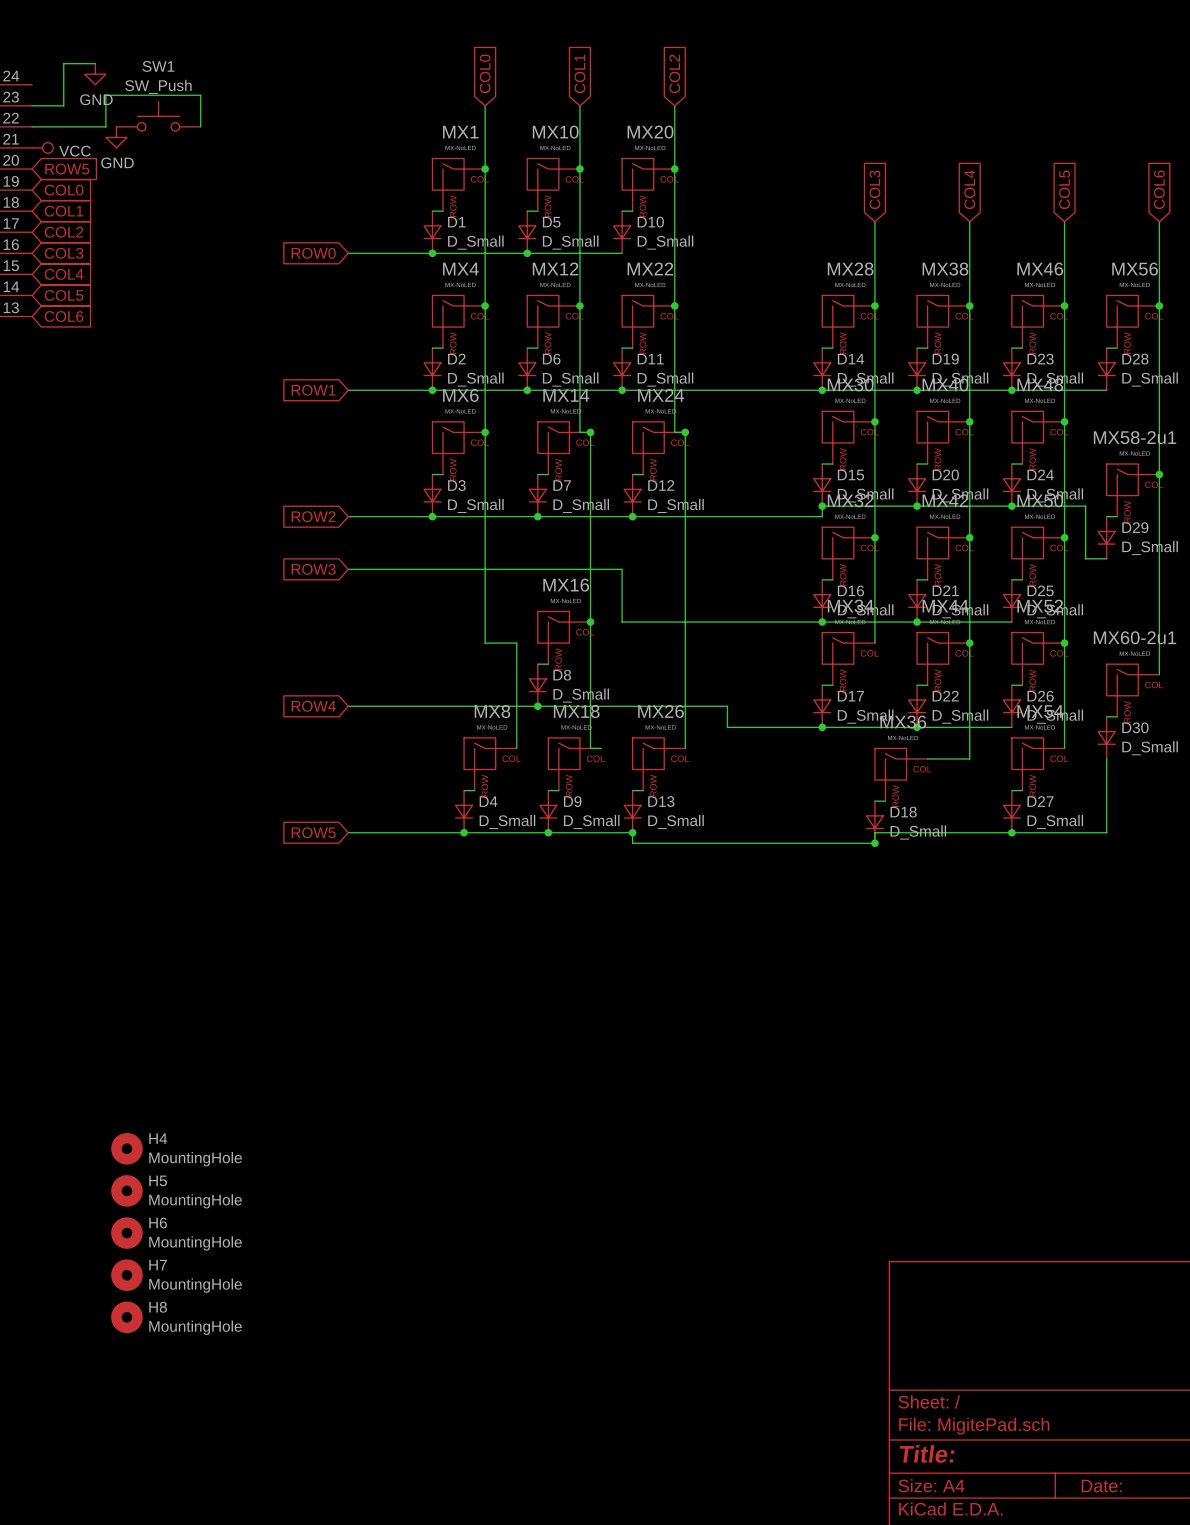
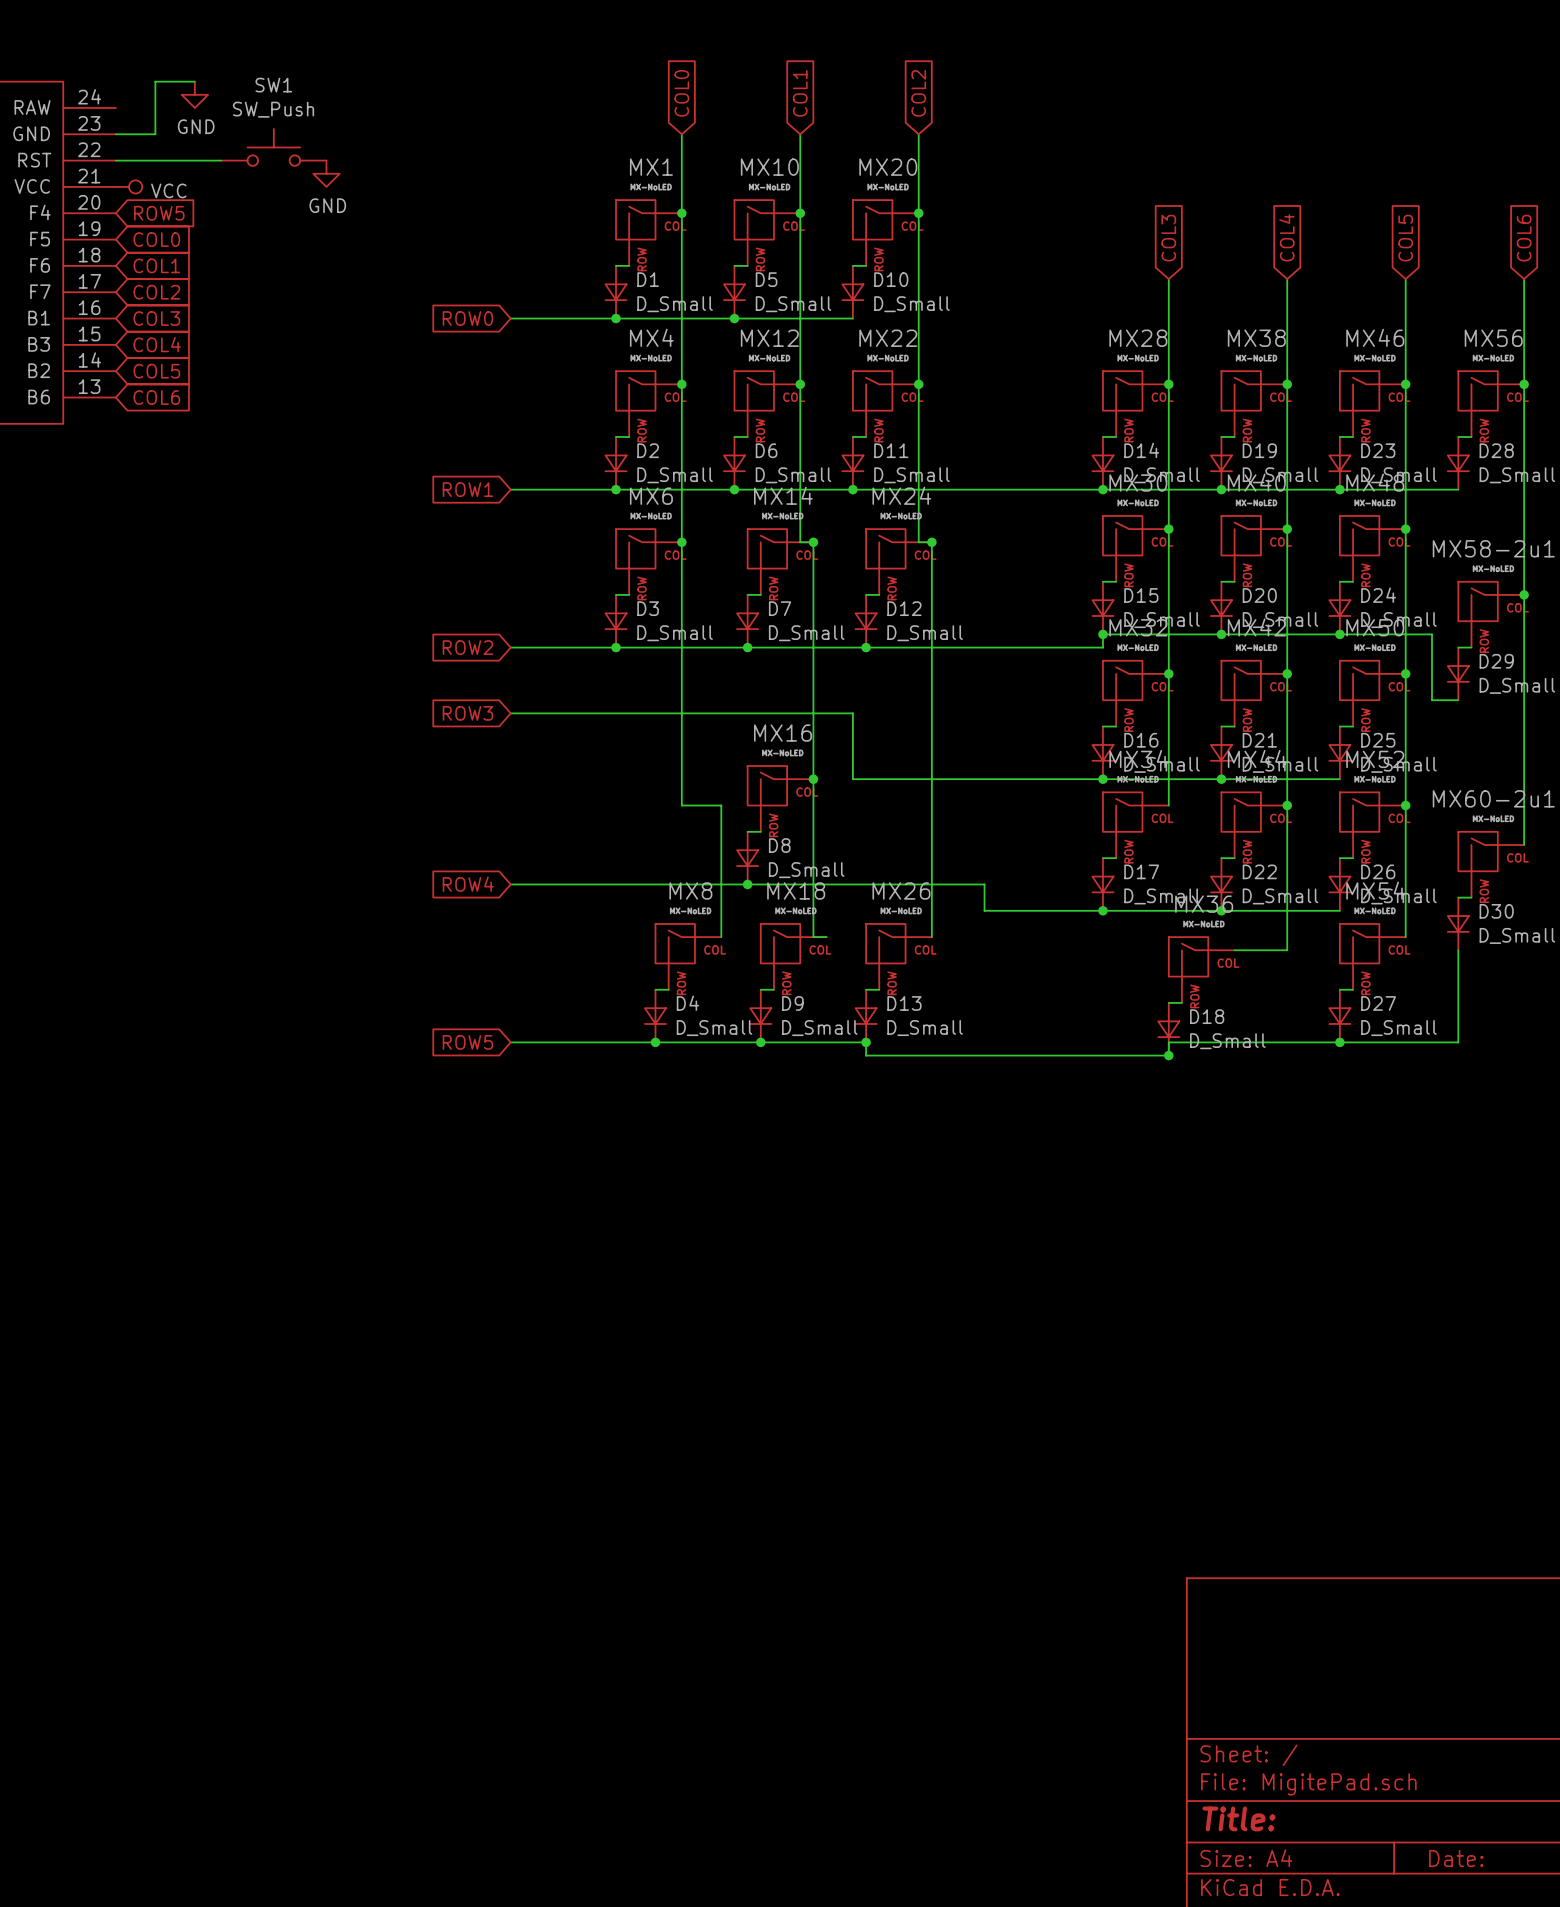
wire: (105, 126) (105, 95) (200, 95) (200, 126) -> (208, 160) (221, 160)
power symbol position: GND (116, 137) -> GND (326, 173)
H4: MountingHole (126, 1148) -> none
H5: MountingHole (126, 1190) -> none
H6: MountingHole (126, 1233) -> none
H7: MountingHole (126, 1275) -> none
H8: MountingHole (126, 1317) -> none

